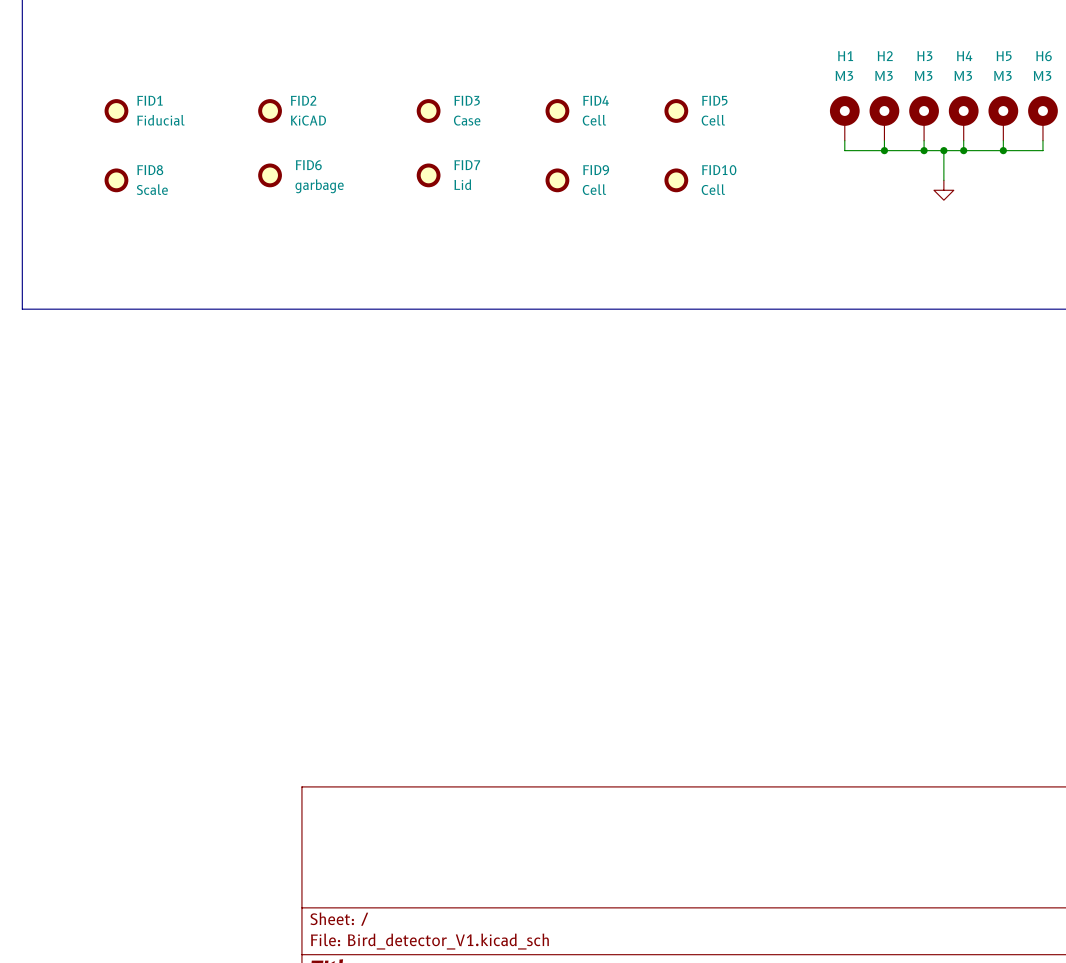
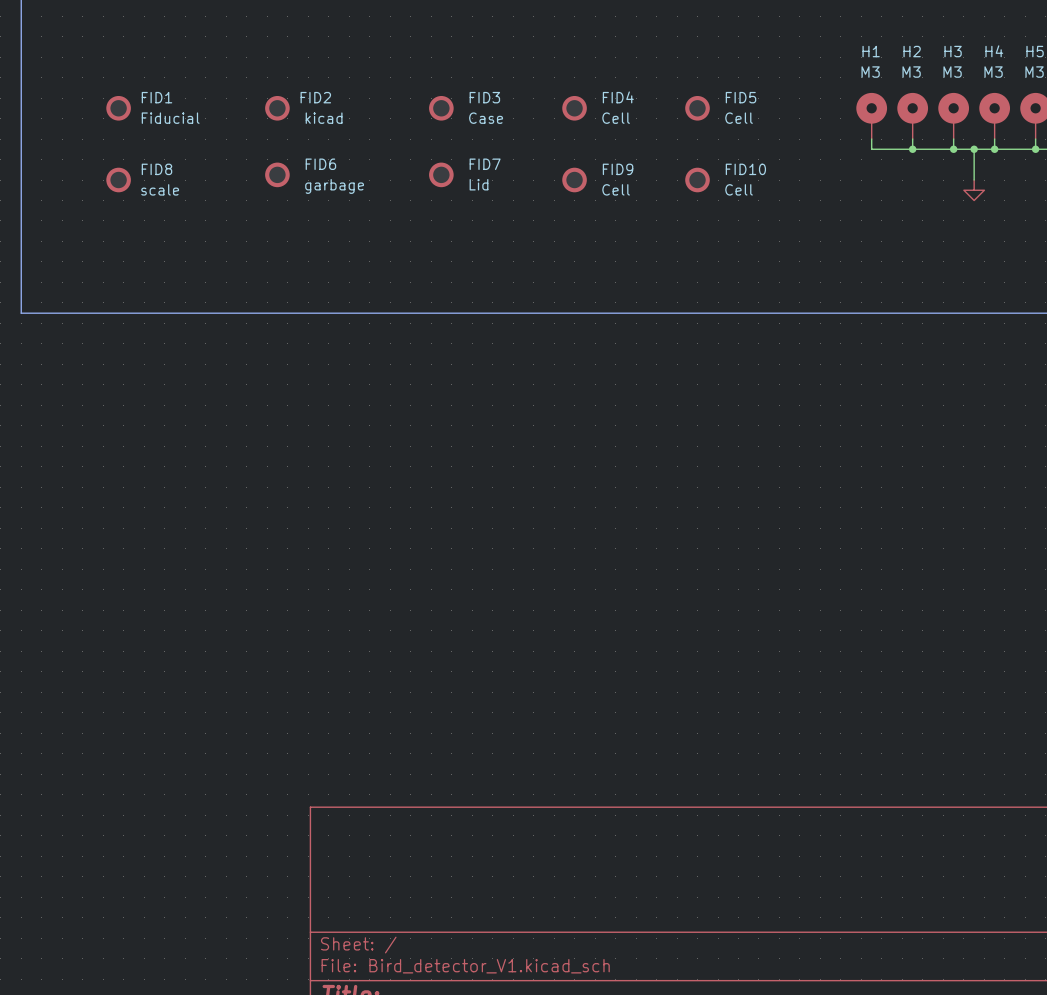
FID2 value: KiCAD (308, 120) -> kicad (324, 118)
FID8 value: Scale (152, 189) -> scale (160, 189)

